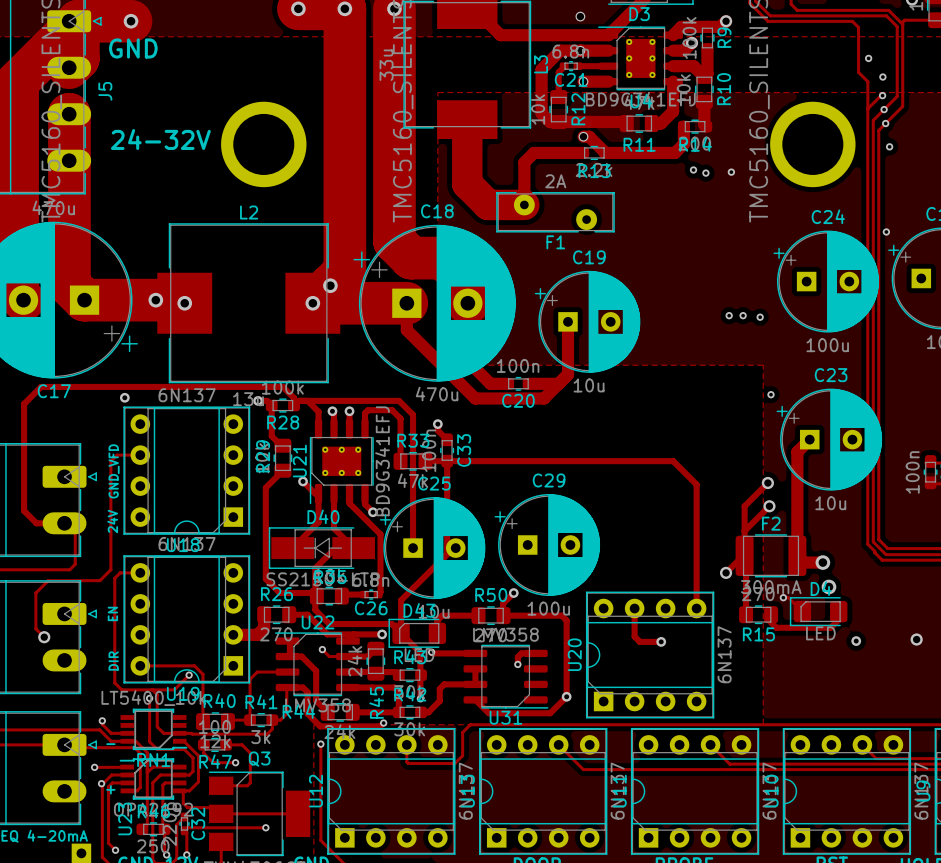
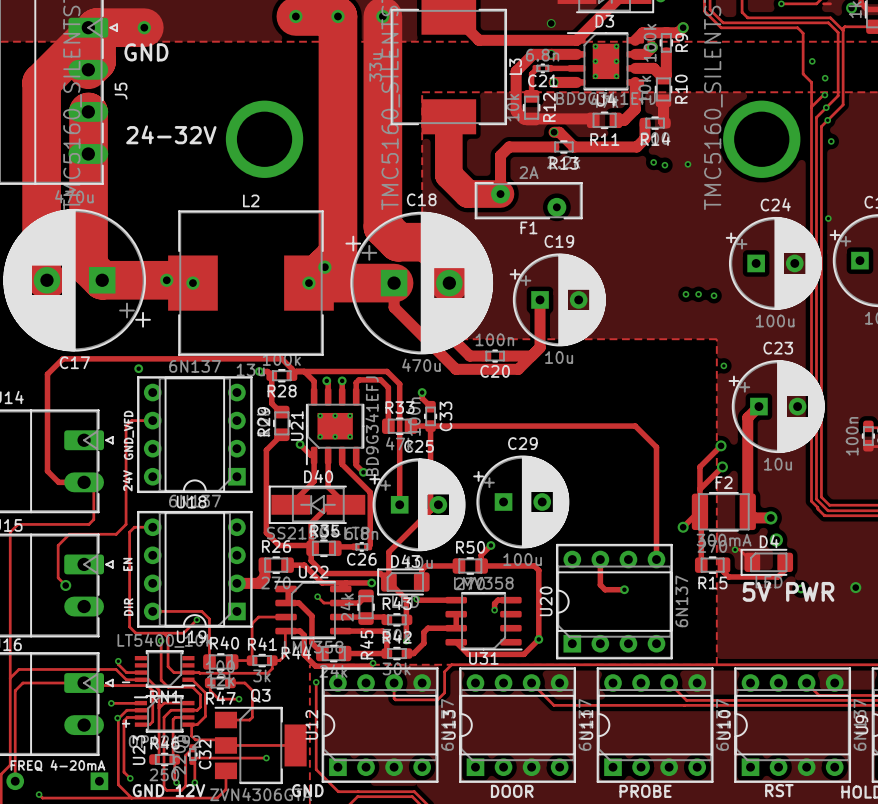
text: none -> 5V PWR (788, 591)

